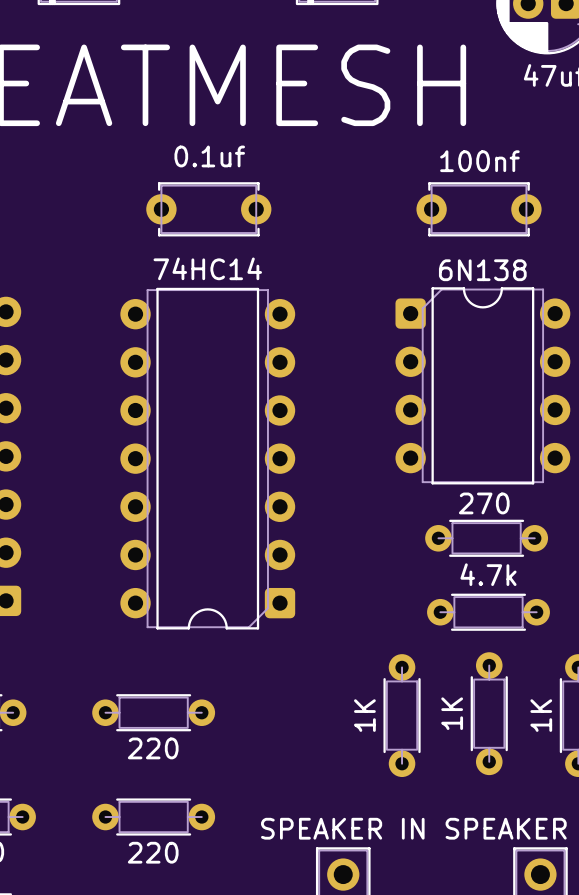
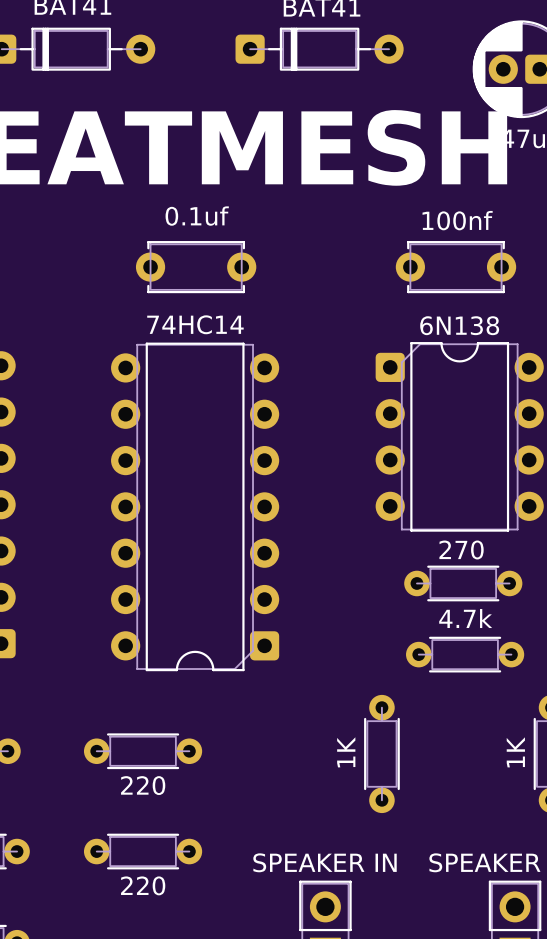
part: 1K (489, 713) -> none

